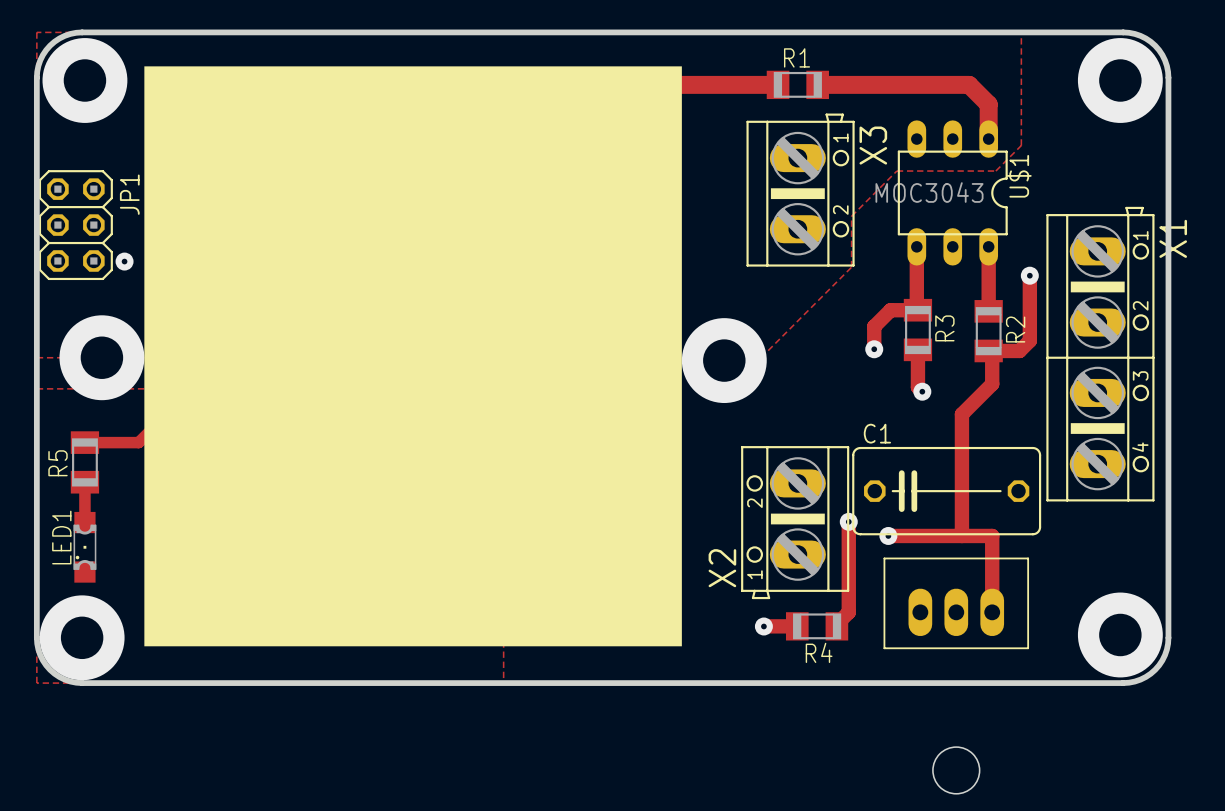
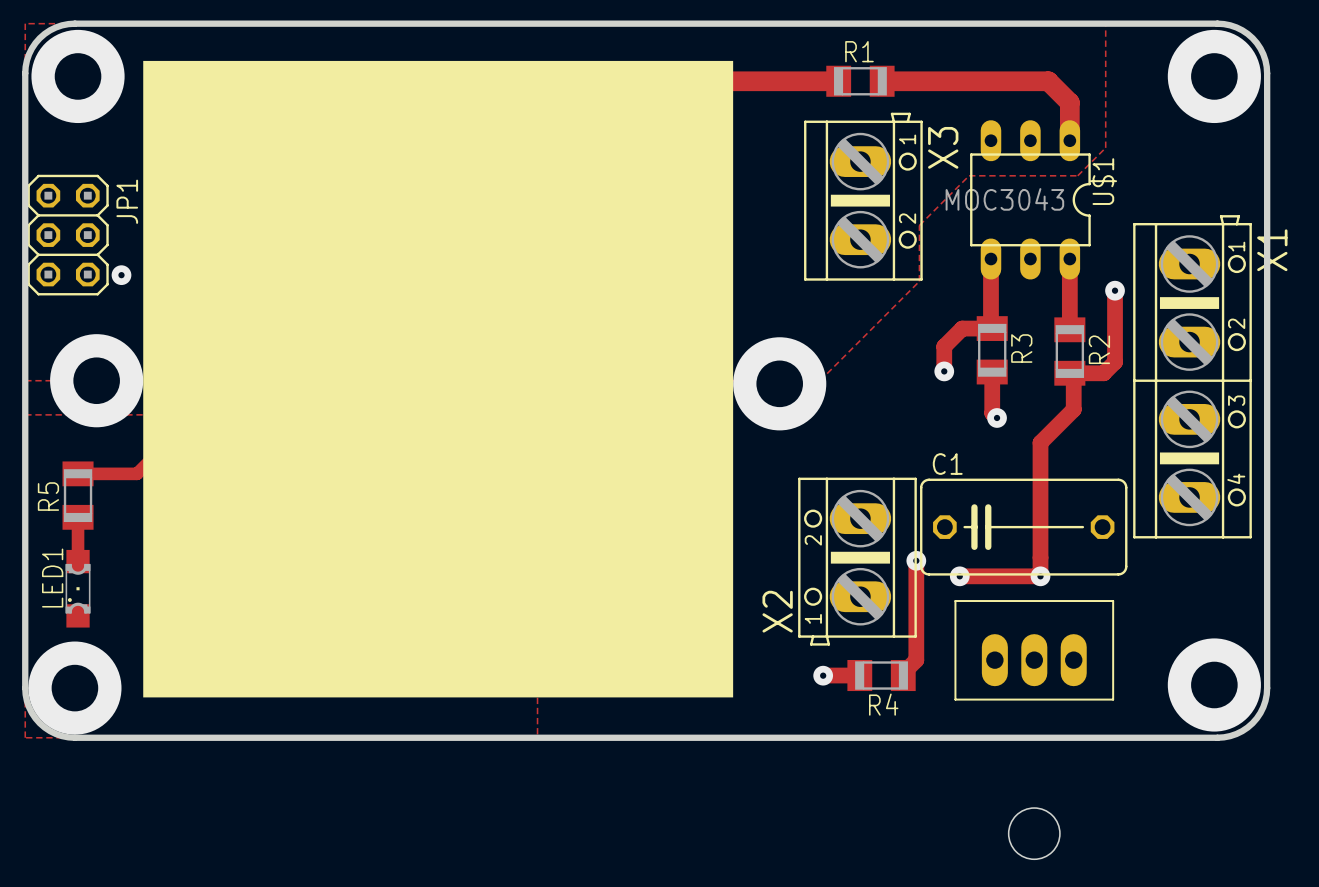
track: (961, 535) (992, 535) (992, 612) -> none
via: none -> (1040, 576)

